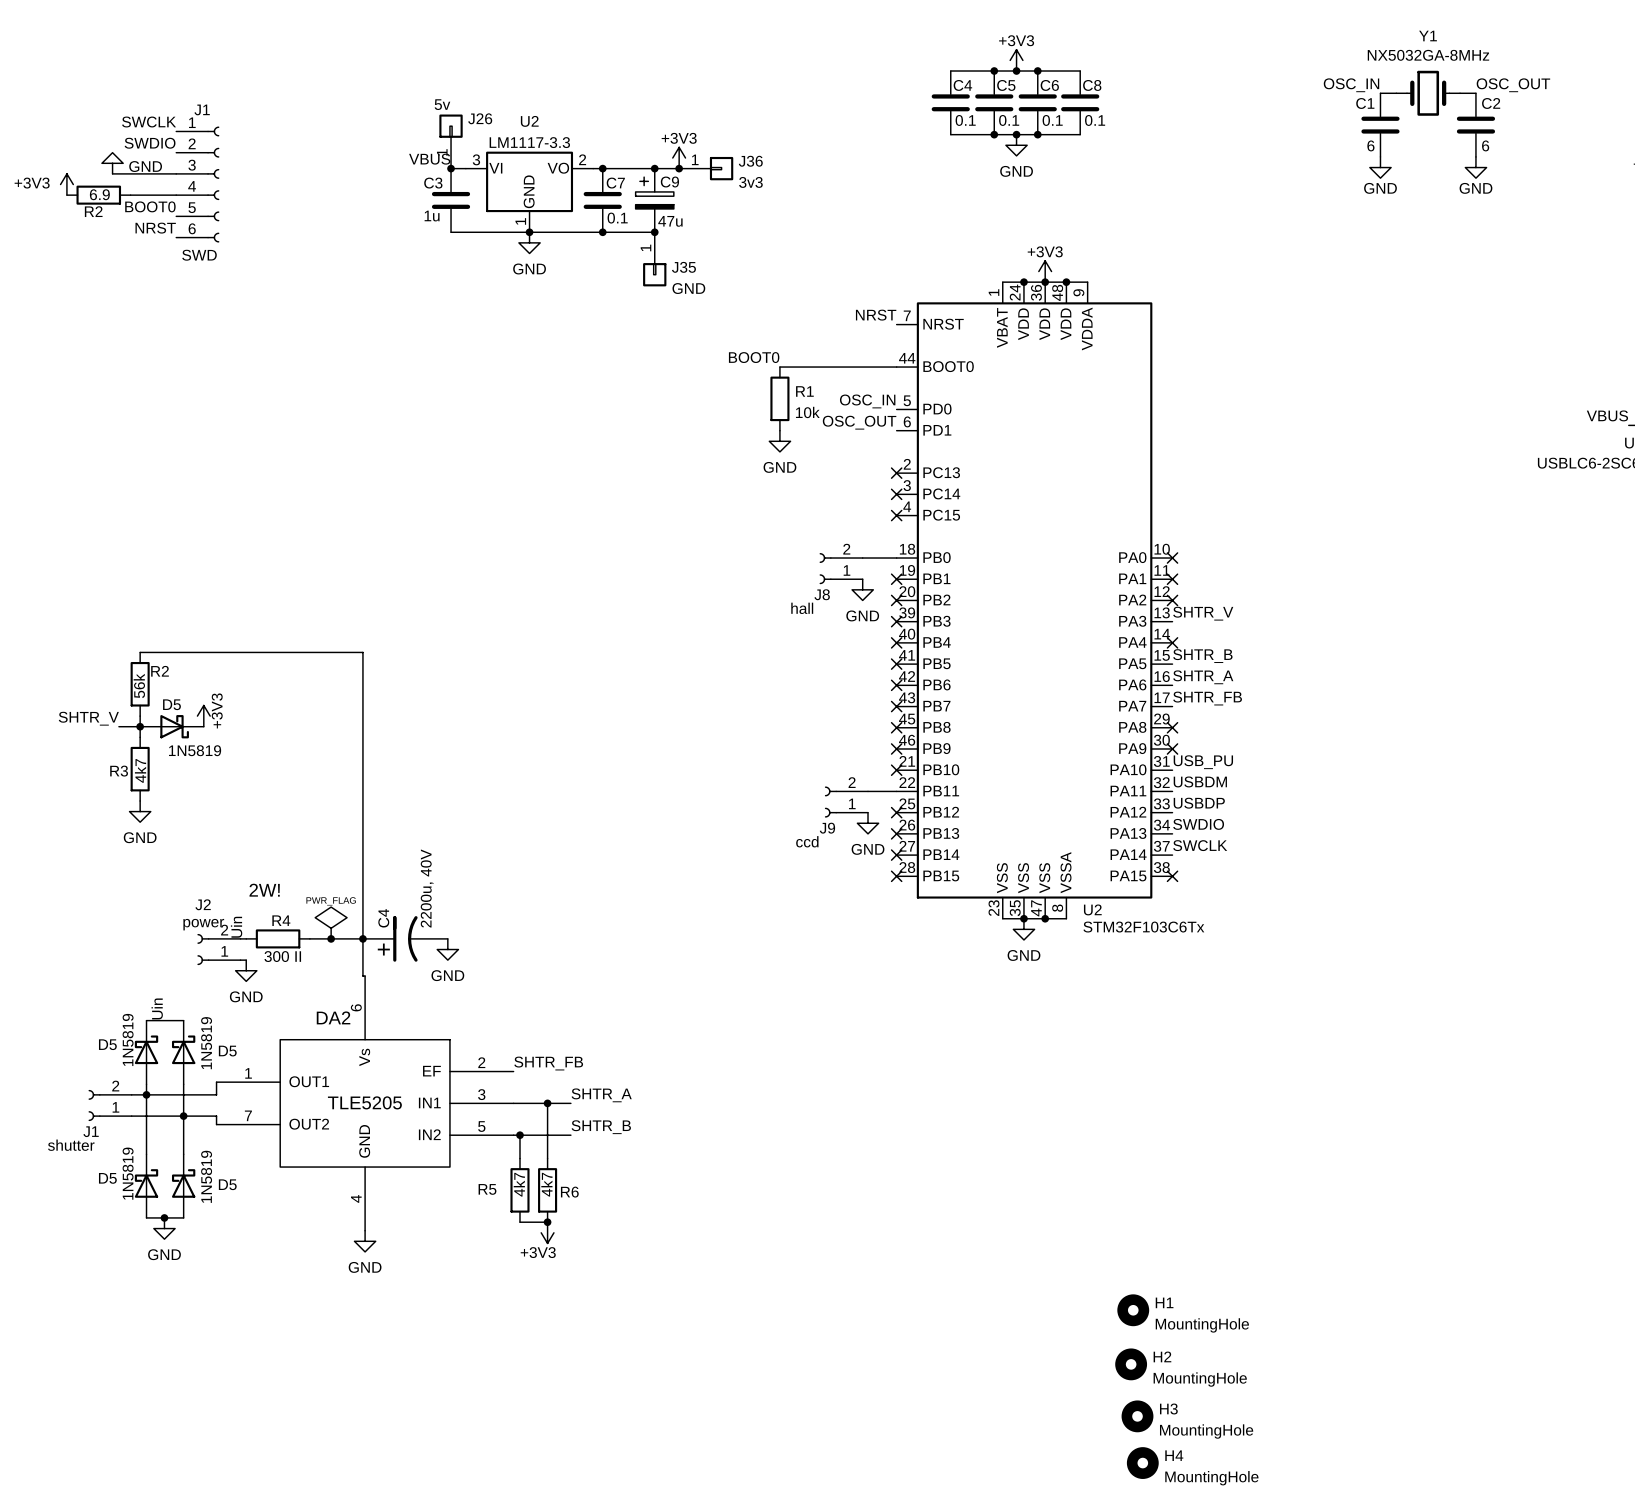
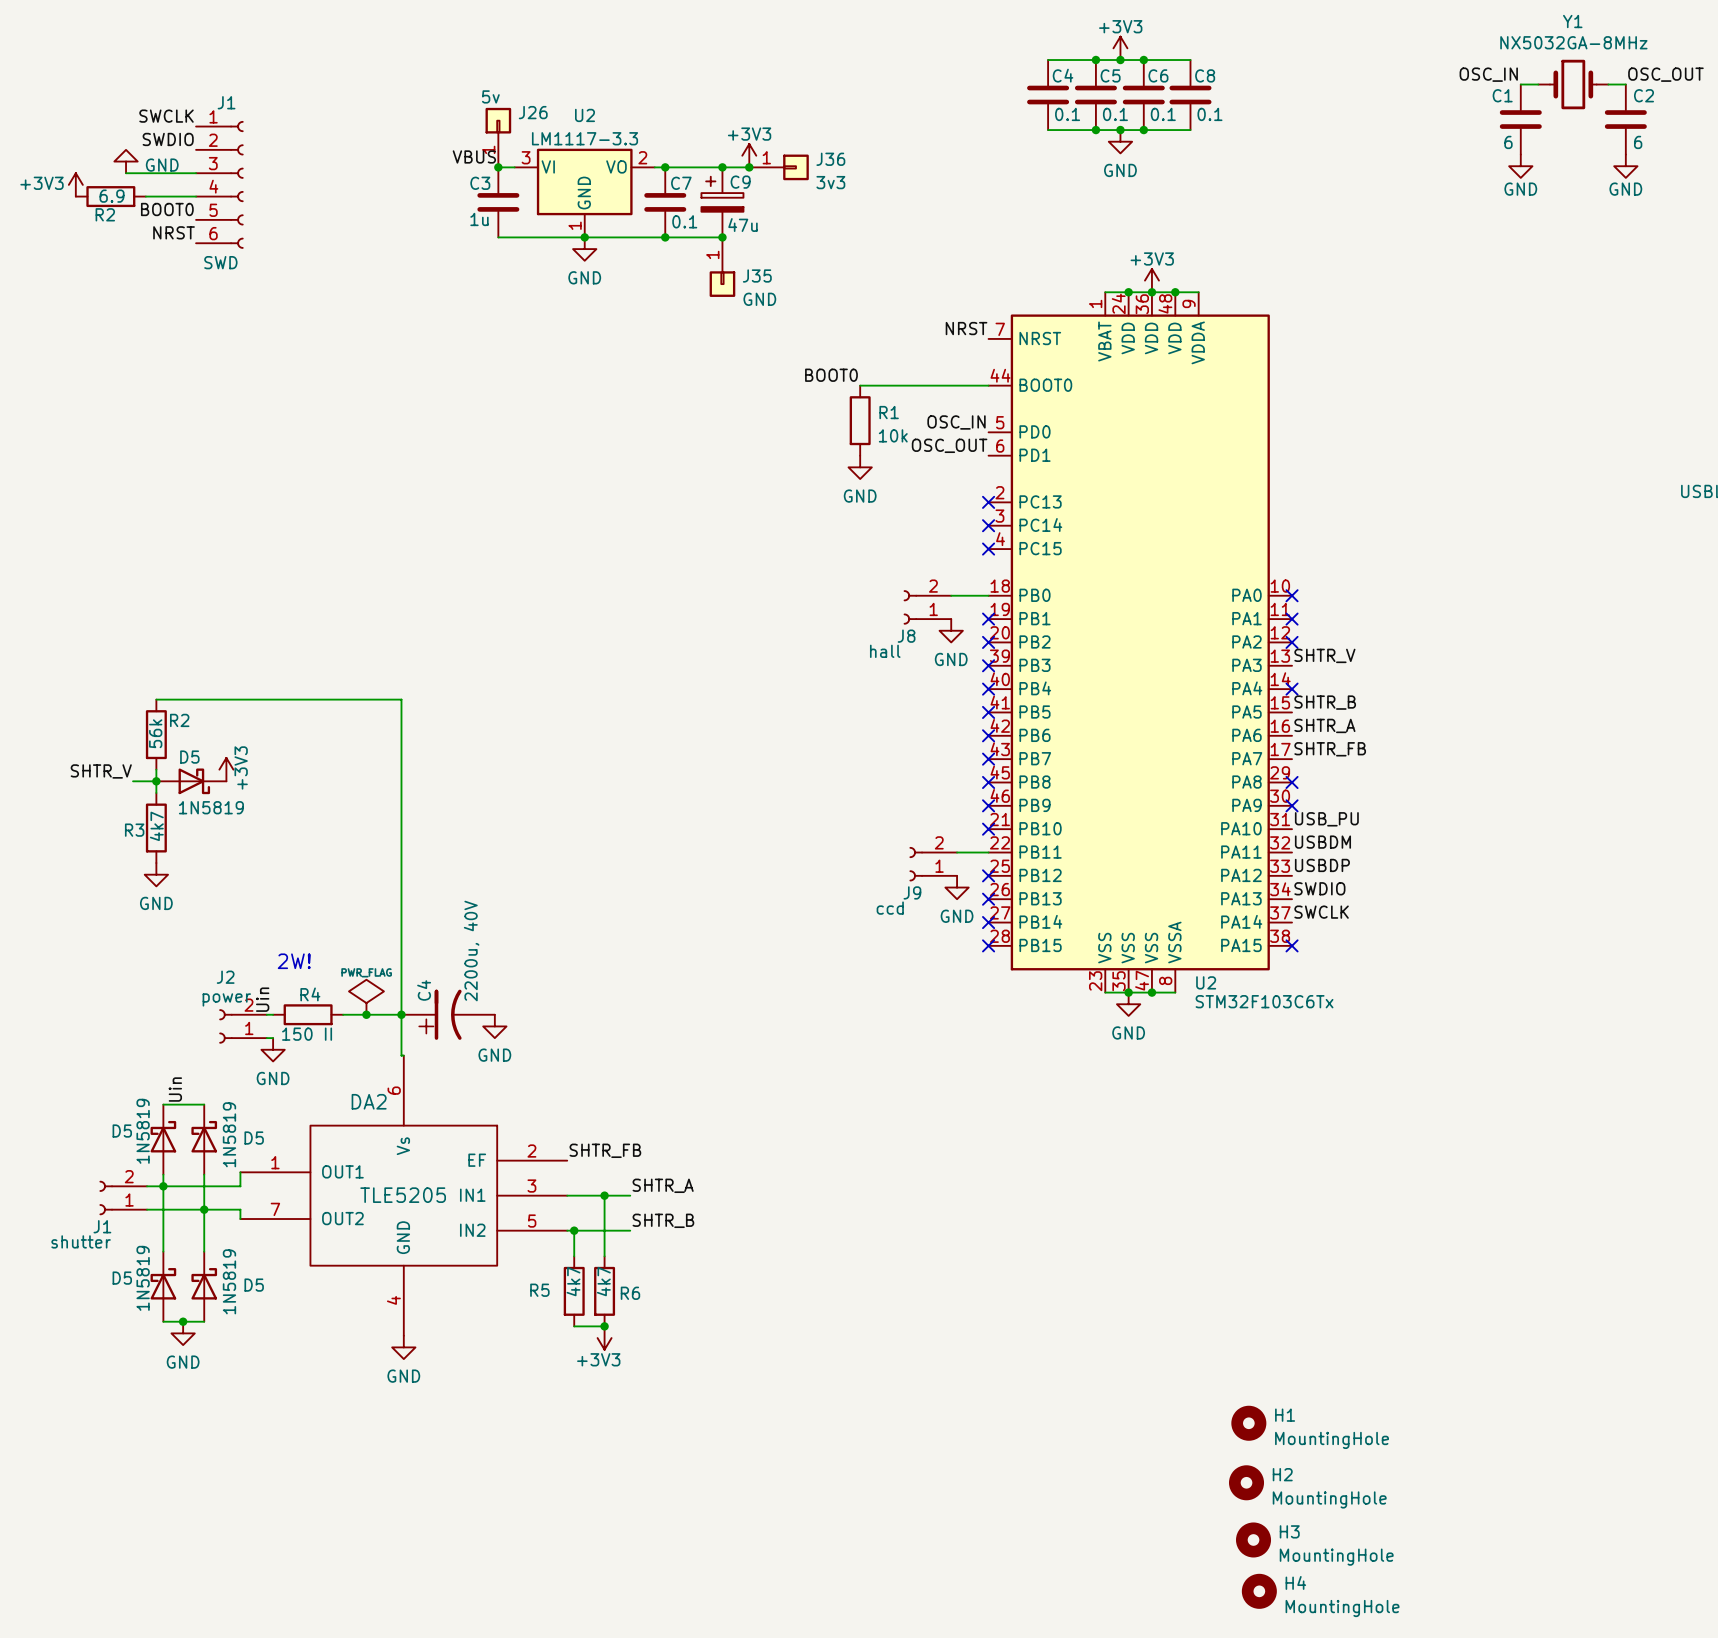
R4 value: 300 II (282, 956) -> 150 II (307, 1034)

